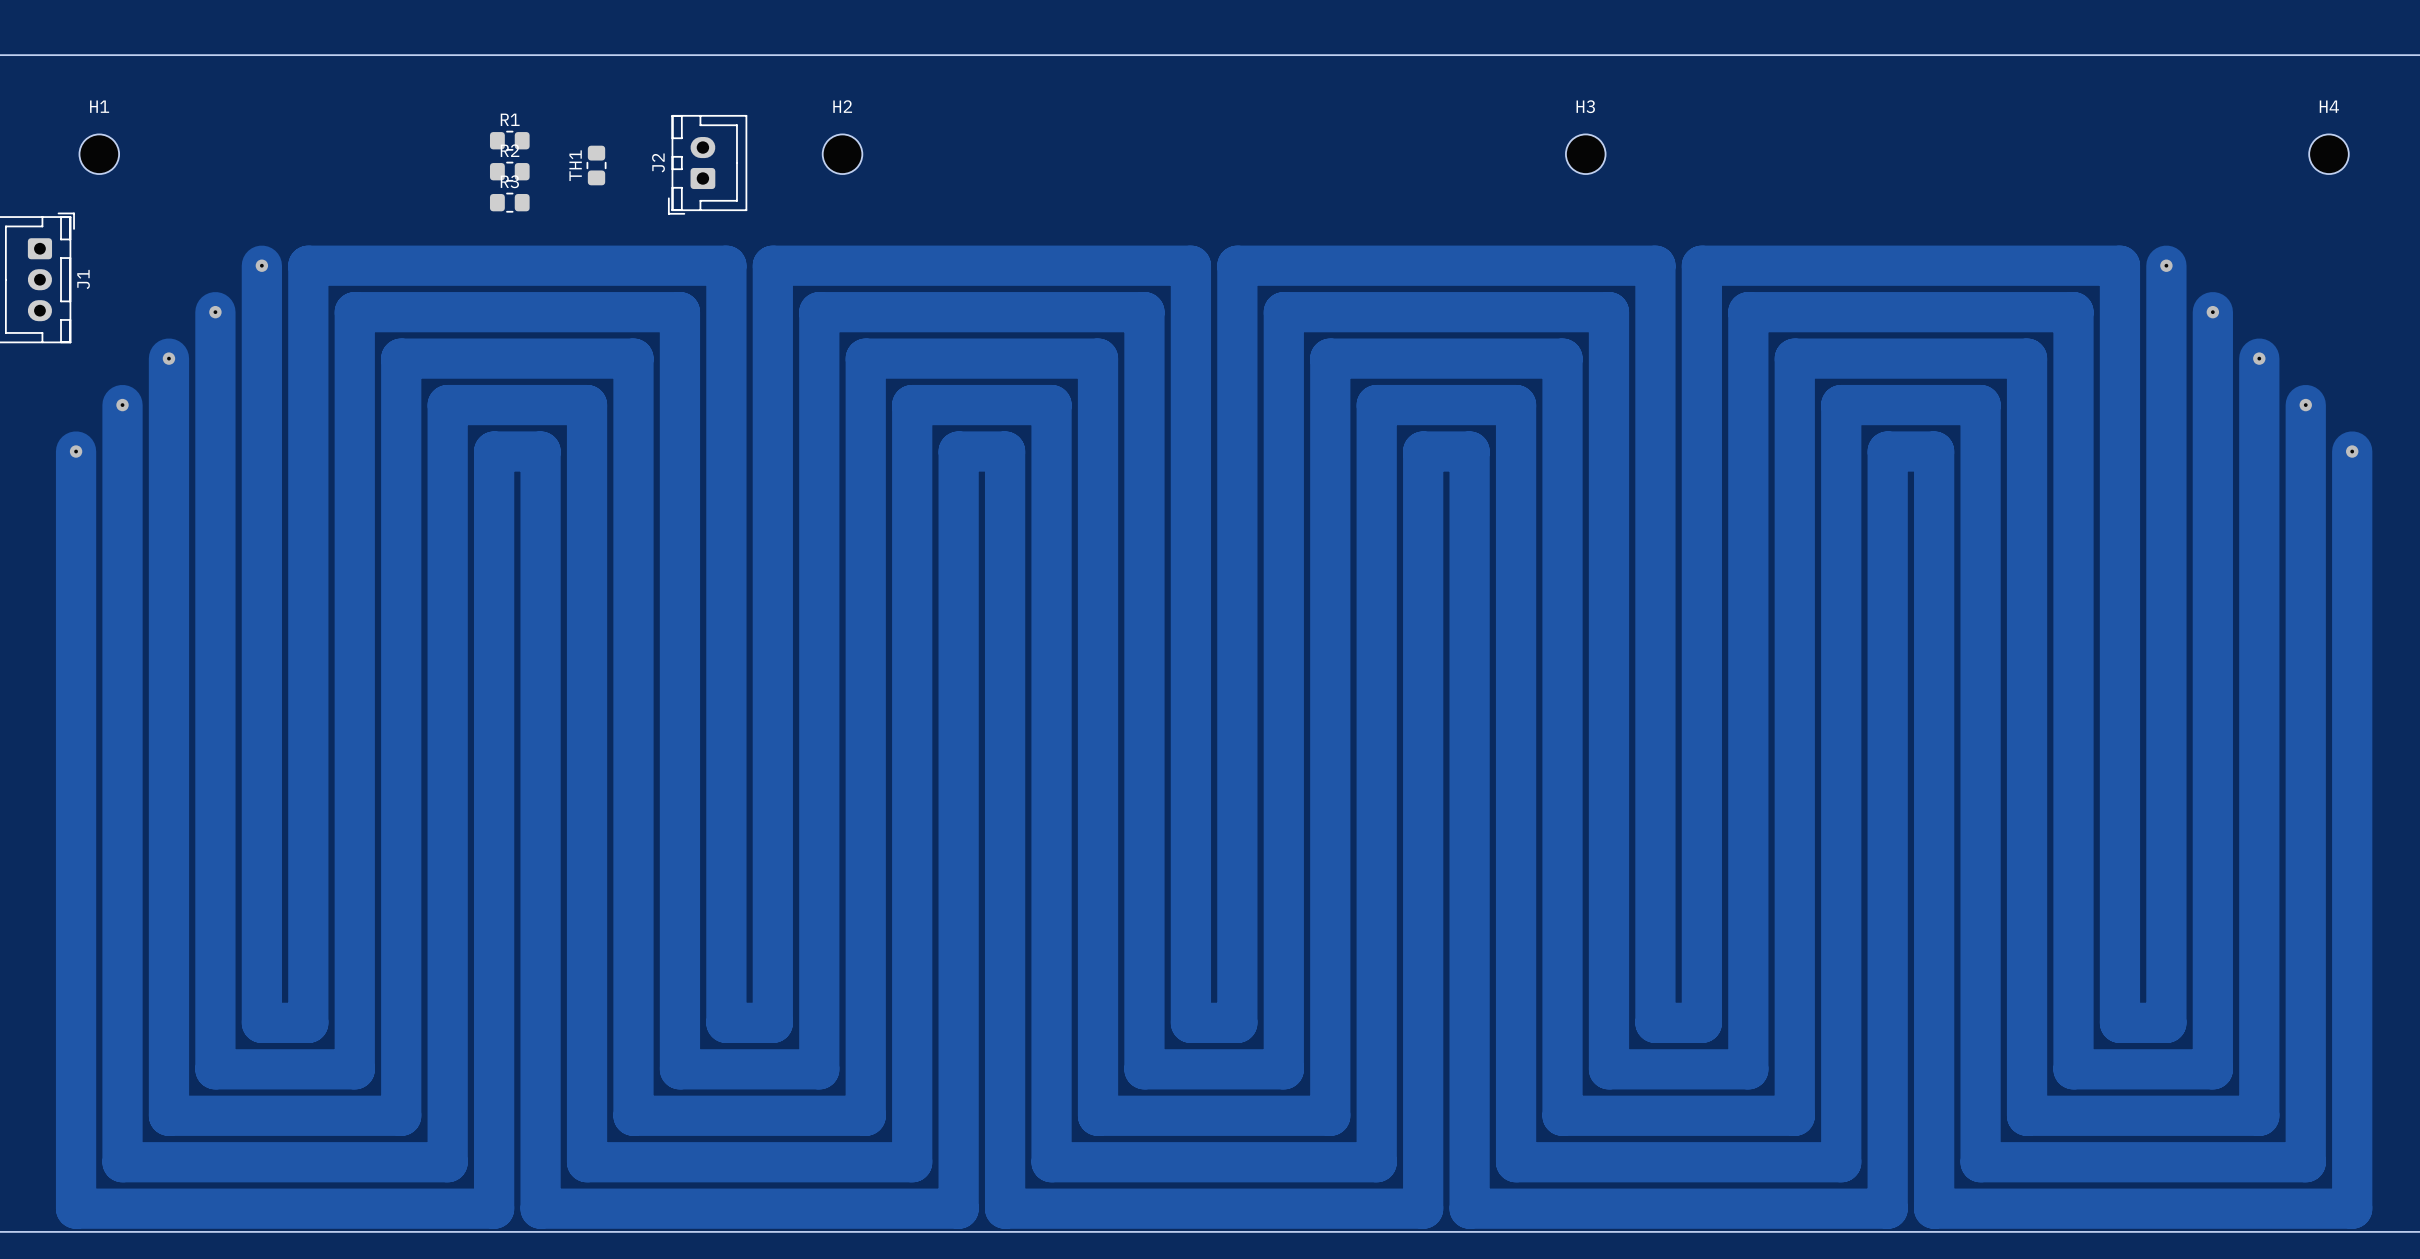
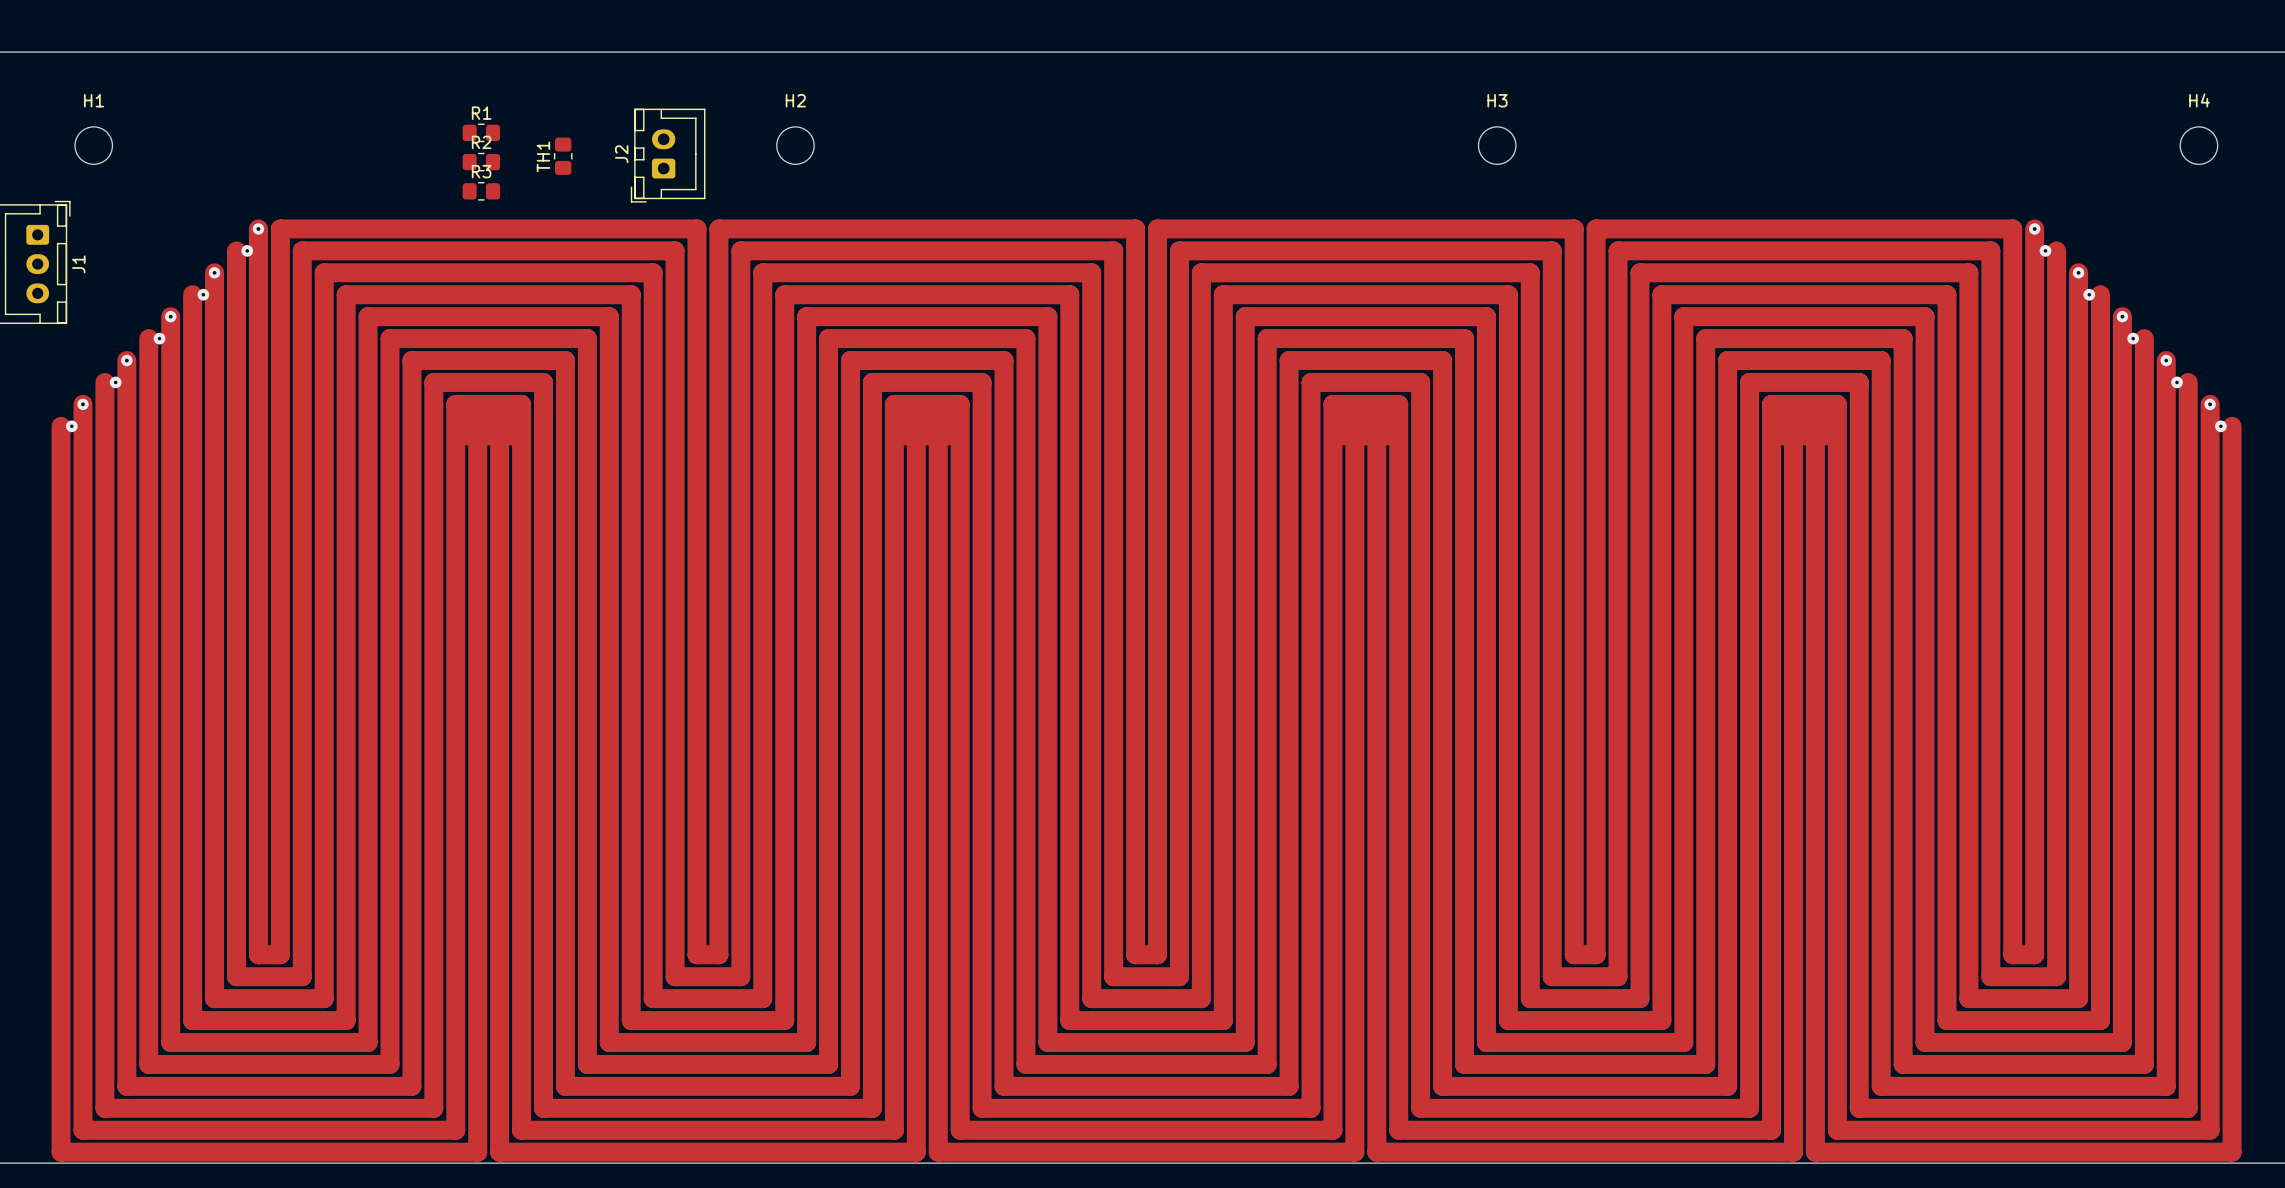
track: none -> (258, 228) (258, 954) (280, 954) (280, 228) (697, 228) (697, 954) (718, 954) (718, 228) (1135, 228) (1135, 954) (1157, 954) (1157, 228) (1574, 228) (1574, 954) (1596, 954) (1596, 228) (2012, 228) (2012, 954) (2034, 954) (2034, 228)
via: none -> (258, 228)
via: none -> (2034, 228)
track: (261, 265) (261, 1022) (308, 1022) (308, 265) (320, 265) -> (236, 250) (236, 976) (302, 976) (302, 250)
track width: thick (308, 265) (726, 265) -> thin (291, 250) (685, 250)
track: (714, 265) (726, 265) (726, 1022) (772, 1022) (772, 265) (784, 265) -> (675, 250) (675, 976) (740, 976) (740, 250)
track width: thick (772, 265) (1190, 265) -> thin (729, 250) (1124, 250)
track: (1179, 265) (1190, 265) (1190, 1022) (1237, 1022) (1237, 265) (1249, 265) -> (1113, 250) (1113, 976) (1179, 976) (1179, 250)
track width: thick (1237, 265) (1655, 265) -> thin (1168, 250) (1563, 250)
track: (1644, 265) (1655, 265) (1655, 1022) (1701, 1022) (1701, 265) (1713, 265) -> (1552, 250) (1552, 976) (1618, 976) (1618, 250)
track width: thick (1701, 265) (2119, 265) -> thin (1606, 250) (2001, 250)
track: (2108, 265) (2119, 265) (2119, 1022) (2166, 1022) (2166, 265) -> (1990, 250) (1990, 976) (2056, 976) (2056, 250)
track: none -> (214, 272) (214, 998) (324, 998) (324, 272) (653, 272) (653, 998) (762, 998) (762, 272) (1091, 272) (1091, 998) (1201, 998) (1201, 272) (1530, 272) (1530, 998) (1639, 998) (1639, 272) (1968, 272) (1968, 998) (2078, 998) (2078, 272)
via: none -> (214, 272)
via: none -> (2078, 272)
track: (215, 312) (215, 1069) (354, 1069) (354, 312) (366, 312) -> (192, 294) (192, 1020) (346, 1020) (346, 294)
track width: thick (354, 312) (679, 312) -> thin (334, 294) (641, 294)
track: (668, 312) (679, 312) (679, 1069) (819, 1069) (819, 312) (831, 312) -> (631, 294) (631, 1020) (784, 1020) (784, 294)
track width: thick (819, 312) (1144, 312) -> thin (773, 294) (1080, 294)
track: (1133, 312) (1144, 312) (1144, 1069) (1283, 1069) (1283, 312) (1295, 312) -> (1069, 294) (1069, 1020) (1223, 1020) (1223, 294)
track width: thick (1283, 312) (1608, 312) -> thin (1212, 294) (1519, 294)
track: (1597, 312) (1608, 312) (1608, 1069) (1748, 1069) (1748, 312) (1760, 312) -> (1508, 294) (1508, 1020) (1661, 1020) (1661, 294)
track width: thick (1748, 312) (2073, 312) -> thin (1650, 294) (1957, 294)
track: (2062, 312) (2073, 312) (2073, 1069) (2212, 1069) (2212, 312) -> (1946, 294) (1946, 1020) (2100, 1020) (2100, 294)
track: none -> (170, 316) (170, 1042) (368, 1042) (368, 316) (609, 316) (609, 1042) (806, 1042) (806, 316) (1047, 316) (1047, 1042) (1245, 1042) (1245, 316) (1486, 316) (1486, 1042) (1683, 1042) (1683, 316) (1925, 316) (1925, 1042) (2122, 1042) (2122, 316)
via: none -> (170, 316)
via: none -> (2122, 316)
track: (168, 358) (168, 1115) (401, 1115) (401, 358) (413, 358) -> (148, 338) (148, 1064) (390, 1064) (390, 338)
track width: thick (401, 358) (633, 358) -> thin (378, 338) (598, 338)
track: (622, 358) (633, 358) (633, 1115) (865, 1115) (865, 358) (877, 358) -> (587, 338) (587, 1064) (828, 1064) (828, 338)
track width: thick (865, 358) (1098, 358) -> thin (817, 338) (1036, 338)
track: (1086, 358) (1098, 358) (1098, 1115) (1330, 1115) (1330, 358) (1342, 358) -> (1025, 338) (1025, 1064) (1267, 1064) (1267, 338)
track width: thick (1330, 358) (1562, 358) -> thin (1255, 338) (1475, 338)
track: (1551, 358) (1562, 358) (1562, 1115) (1794, 1115) (1794, 358) (1806, 358) -> (1464, 338) (1464, 1064) (1705, 1064) (1705, 338)
track width: thick (1794, 358) (2027, 358) -> thin (1694, 338) (1913, 338)
track: (2015, 358) (2027, 358) (2027, 1115) (2259, 1115) (2259, 358) -> (1903, 338) (1903, 1064) (2144, 1064) (2144, 338)
track: none -> (126, 360) (126, 1086) (411, 1086) (411, 360) (565, 360) (565, 1086) (850, 1086) (850, 360) (1004, 360) (1004, 1086) (1289, 1086) (1289, 360) (1442, 360) (1442, 1086) (1727, 1086) (1727, 360) (1881, 360) (1881, 1086) (2166, 1086) (2166, 360)
via: none -> (126, 360)
via: none -> (2166, 360)
track: (122, 405) (122, 1162) (447, 1162) (447, 405) (459, 405) -> (104, 382) (104, 1108) (433, 1108) (433, 382)
track width: thick (447, 405) (587, 405) -> thin (422, 382) (554, 382)
track: (575, 405) (587, 405) (587, 1162) (912, 1162) (912, 405) (924, 405) -> (543, 382) (543, 1108) (872, 1108) (872, 382)
track width: thick (912, 405) (1051, 405) -> thin (861, 382) (992, 382)
track: (1040, 405) (1051, 405) (1051, 1162) (1376, 1162) (1376, 405) (1388, 405) -> (982, 382) (982, 1108) (1311, 1108) (1311, 382)
track width: thick (1376, 405) (1516, 405) -> thin (1299, 382) (1431, 382)
track: (1504, 405) (1516, 405) (1516, 1162) (1841, 1162) (1841, 405) (1853, 405) -> (1420, 382) (1420, 1108) (1749, 1108) (1749, 382)
track width: thick (1841, 405) (1980, 405) -> thin (1738, 382) (1870, 382)
track: (1969, 405) (1980, 405) (1980, 1162) (2305, 1162) (2305, 405) -> (1859, 382) (1859, 1108) (2188, 1108) (2188, 382)
track: none -> (82, 404) (82, 1130) (455, 1130) (455, 404) (521, 404) (521, 1130) (894, 1130) (894, 404) (960, 404) (960, 1130) (1332, 1130) (1332, 404) (1398, 404) (1398, 1130) (1771, 1130) (1771, 404) (1837, 404) (1837, 1130) (2210, 1130) (2210, 404)
via: none -> (82, 404)
via: none -> (2210, 404)
track: none -> (61, 426) (61, 1152) (477, 1152) (477, 426)
track: (76, 451) (76, 1208) (494, 1208) (494, 451) -> none
track: none -> (499, 426) (499, 1152) (916, 1152) (916, 426)
track: (540, 451) (540, 1208) (958, 1208) (958, 451) -> none
track: none -> (938, 426) (938, 1152) (1354, 1152) (1354, 426)
track: (1005, 451) (1005, 1208) (1423, 1208) (1423, 451) -> none
track: none -> (1376, 426) (1376, 1152) (1793, 1152) (1793, 426)
track: (1469, 451) (1469, 1208) (1887, 1208) (1887, 451) -> none
track: none -> (1815, 426) (1815, 1152) (2232, 1152) (2232, 426)
track: (1934, 451) (1934, 1208) (2352, 1208) (2352, 451) -> none

